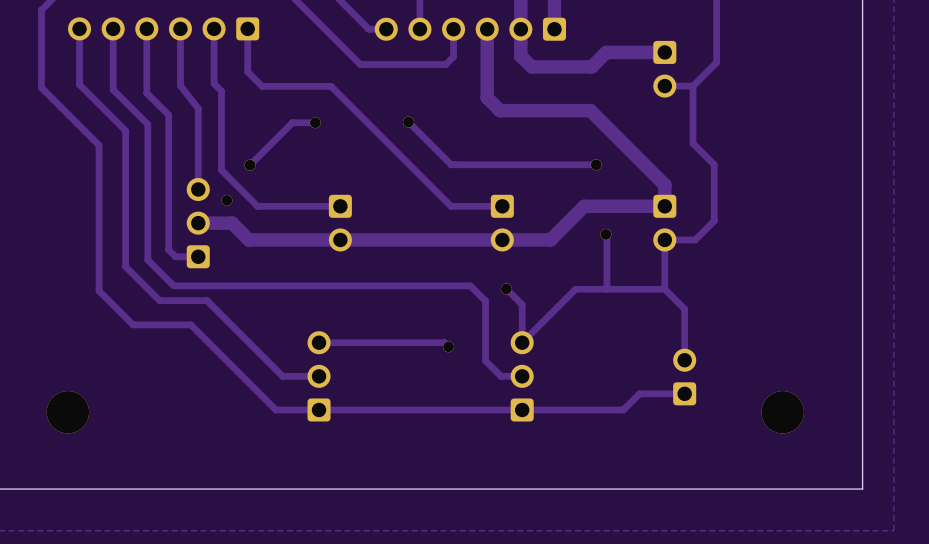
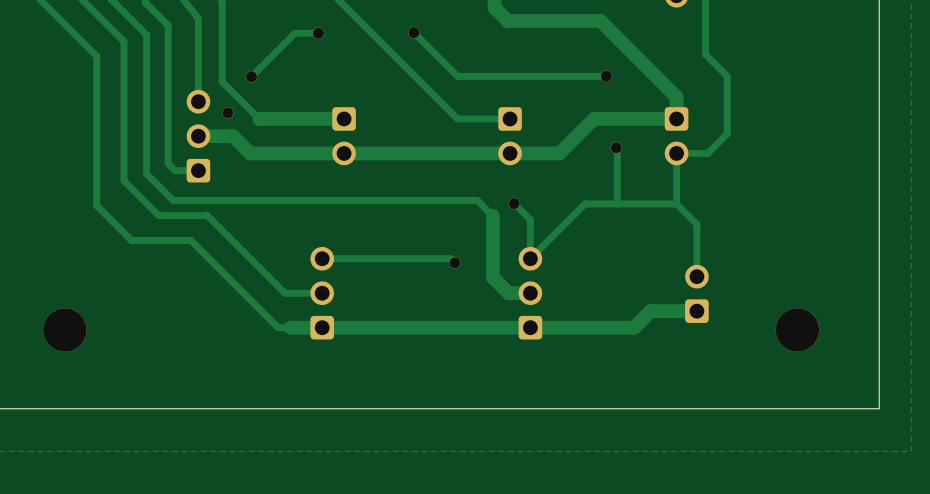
track width: thin (340, 206) (257, 206) -> thick (344, 118) (259, 118)
track width: thin (485, 301) (485, 360) (501, 376) (522, 376) -> thick (492, 216) (492, 277) (508, 293) (530, 293)
track width: thin (684, 393) (639, 393) (623, 409) (288, 409) -> thick (696, 311) (650, 311) (634, 327) (290, 327)

